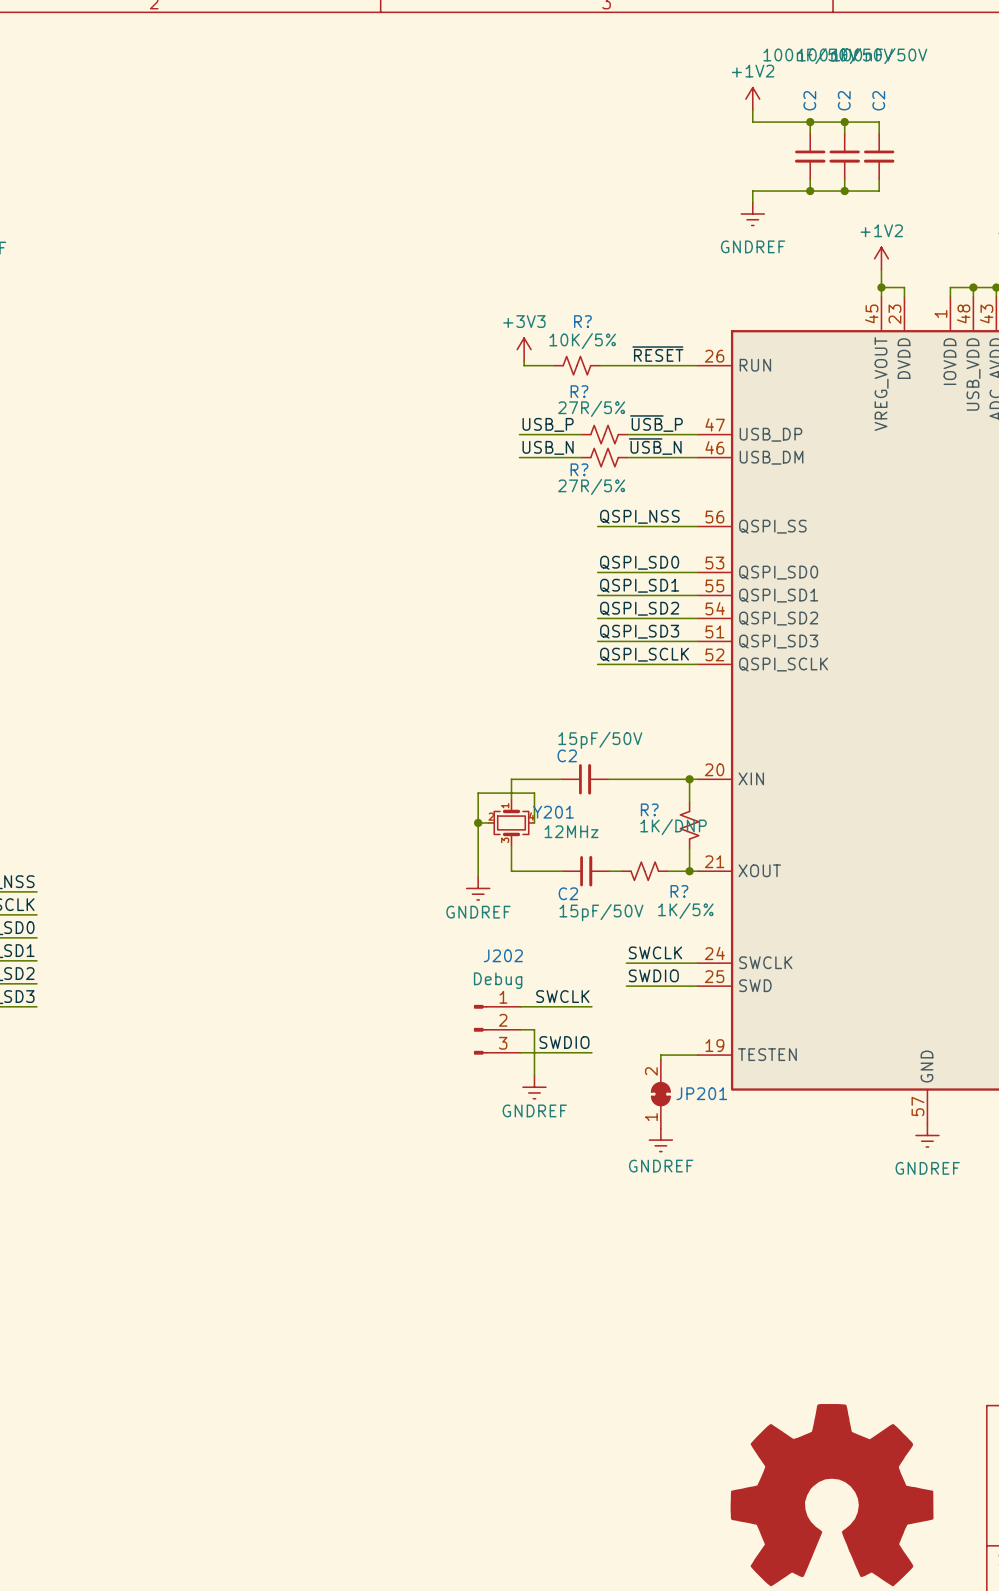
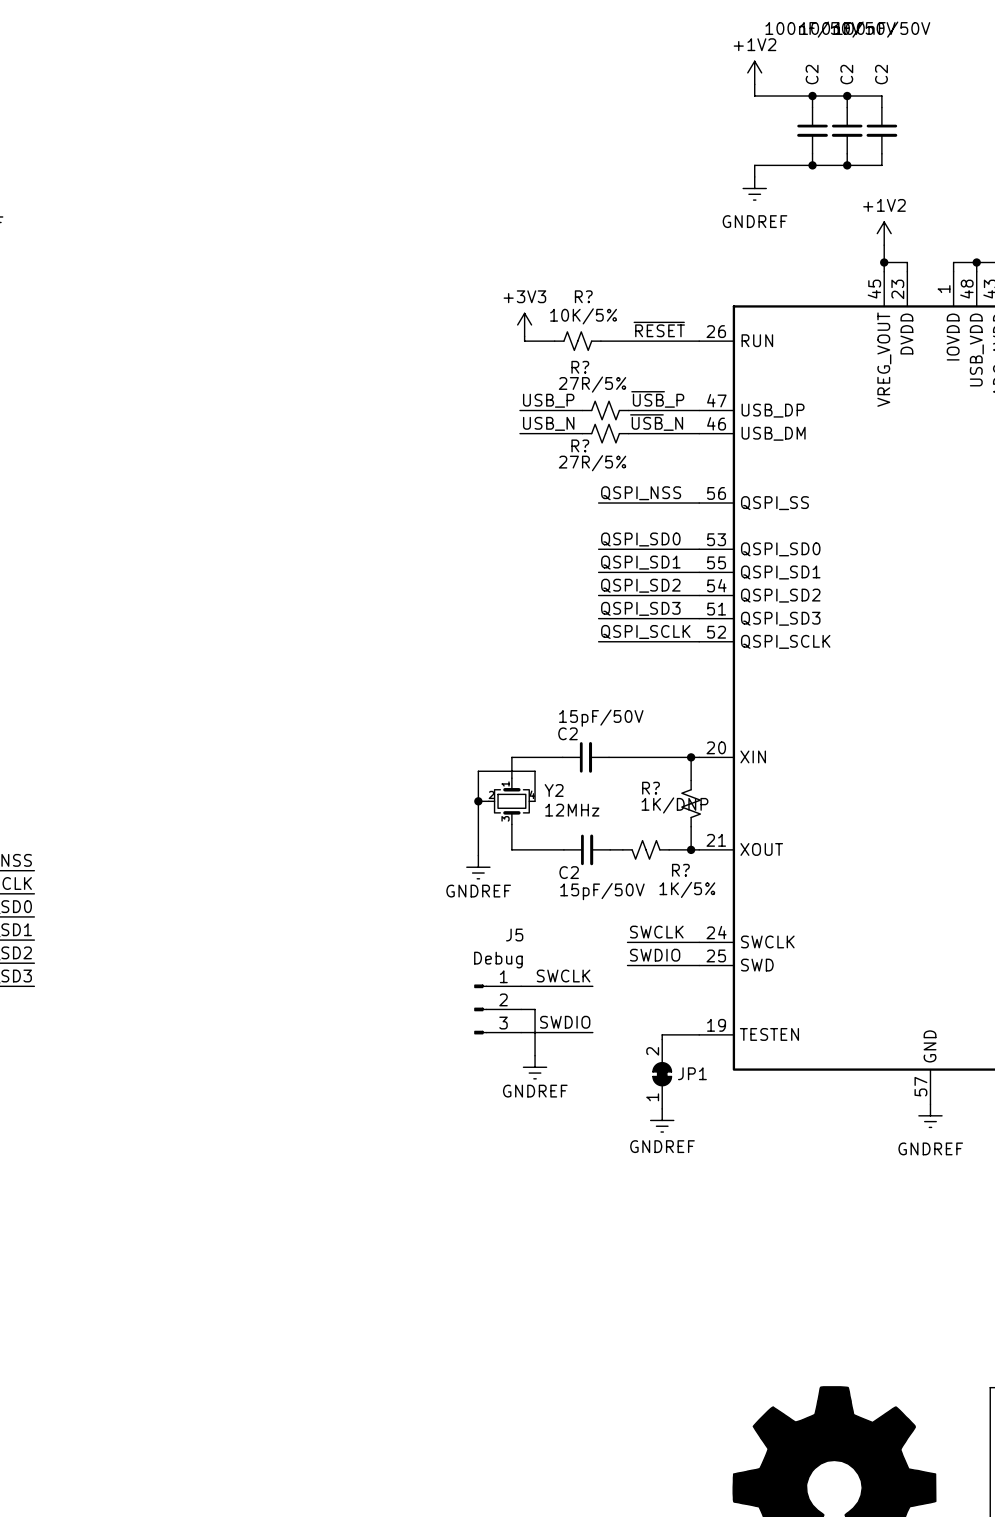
Y201 name: Y201 (553, 812) -> Y2 (554, 790)
J202 name: J202 (503, 955) -> J5 (514, 935)
JP201 name: JP201 (701, 1093) -> JP1 (692, 1073)

